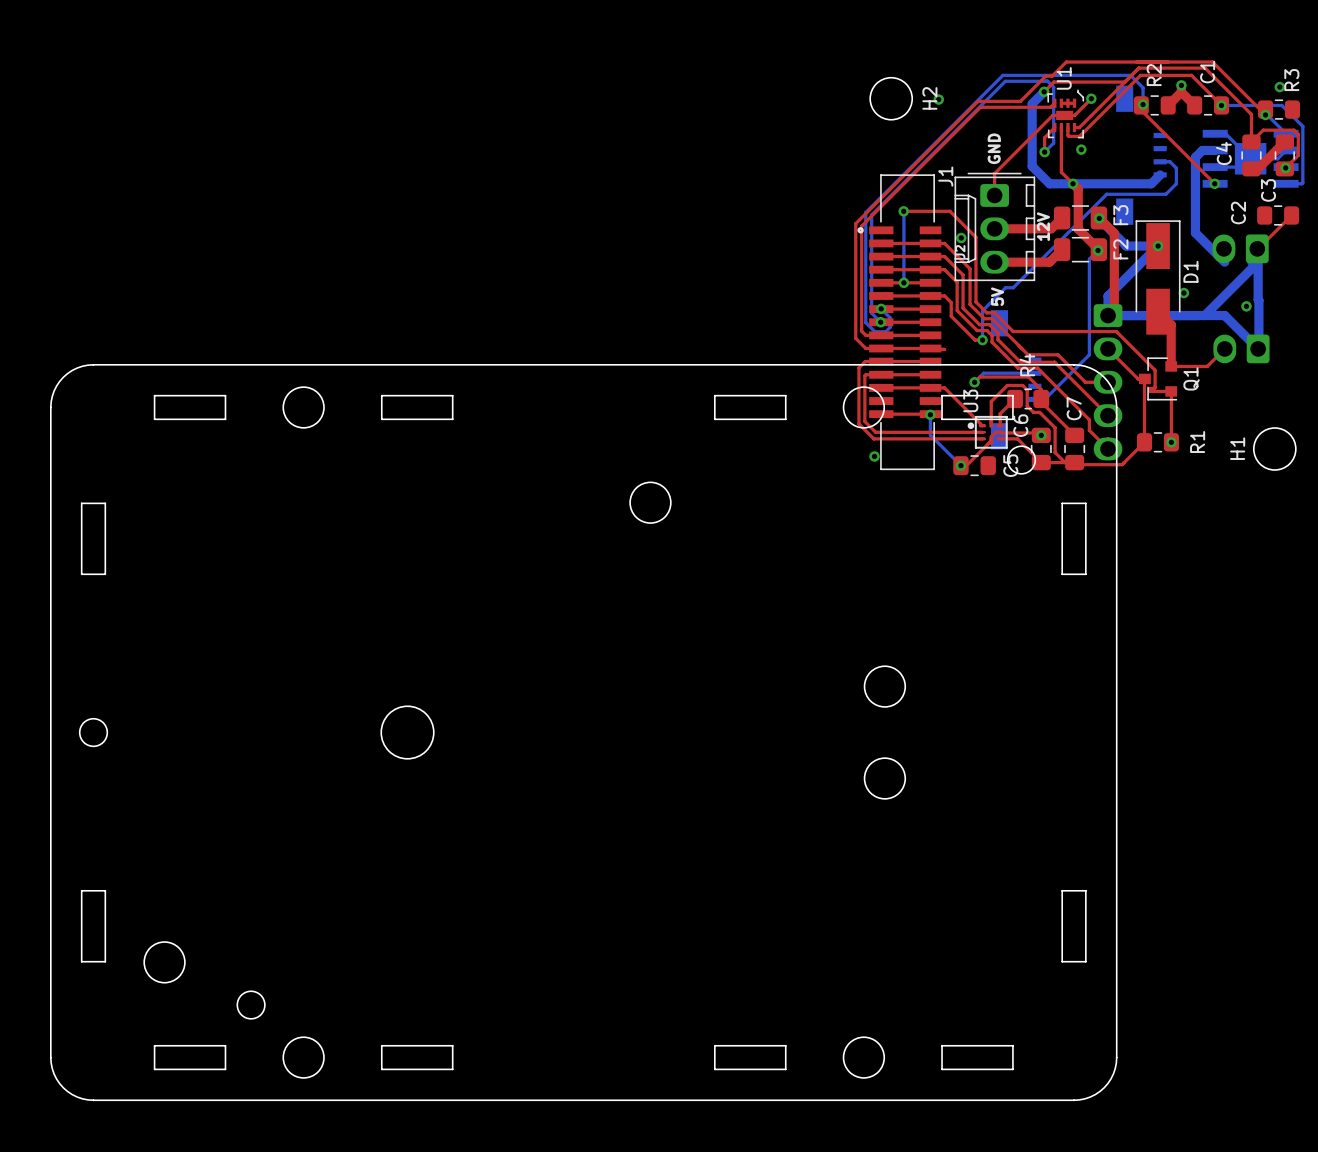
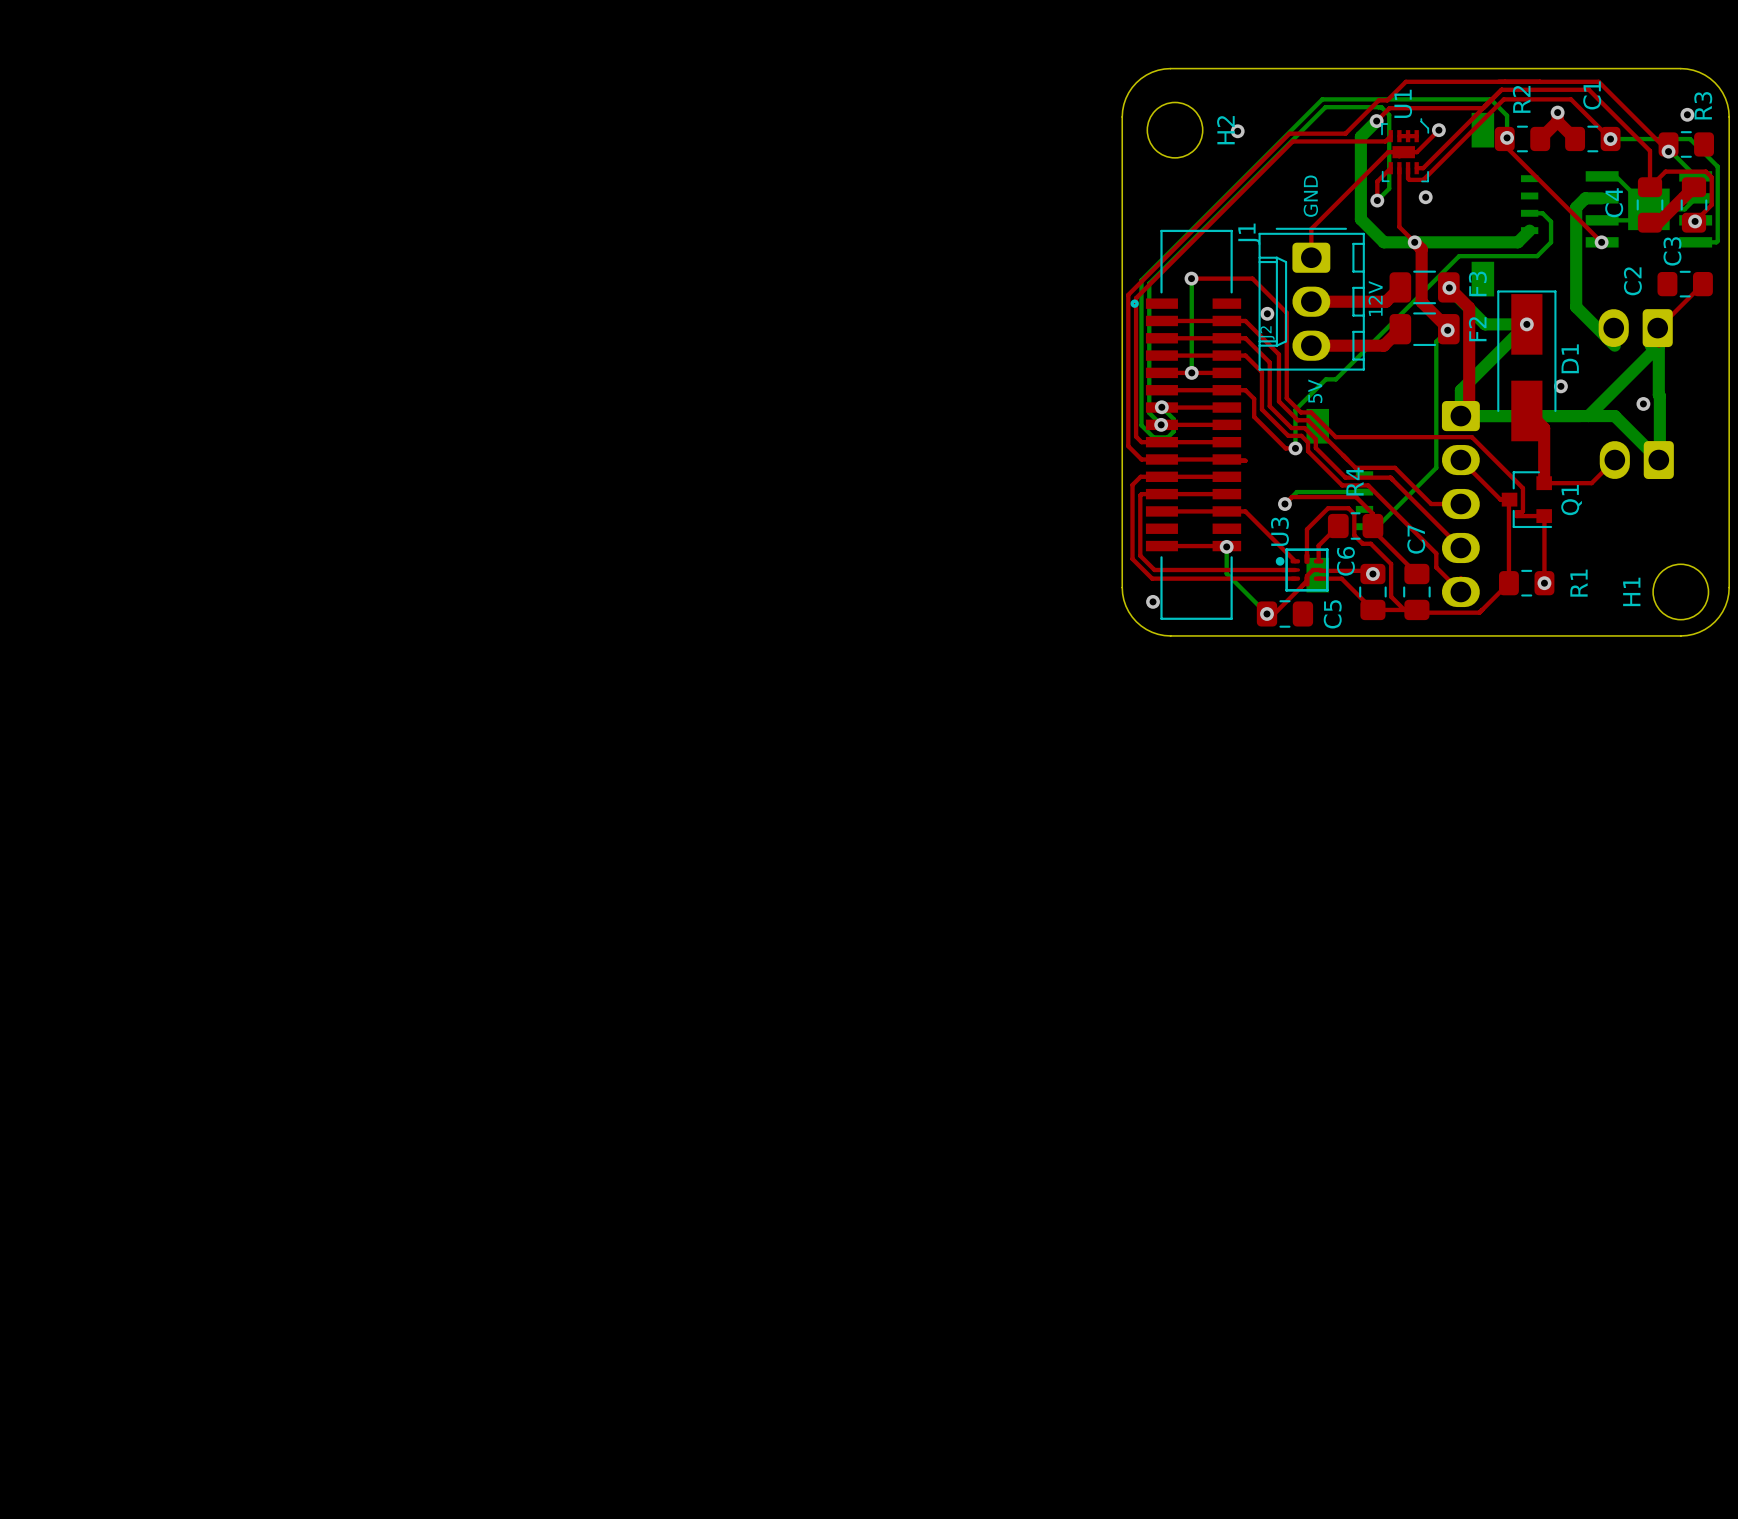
board edge: none -> (1170, 68) (1680, 68) (1699, 72) (1715, 82) (1725, 98) (1729, 116) (1729, 587) (1725, 606) (1715, 621) (1699, 632) (1680, 635) (1170, 635) (1152, 632) (1136, 621) (1125, 606) (1122, 587) (1122, 116) (1125, 98) (1136, 82) (1152, 72) (1170, 68)
board edge: (93, 364) (1074, 364) (1085, 366) (1099, 373) (1113, 391) (1116, 407) (1116, 1057) (1113, 1073) (1107, 1083) (1090, 1097) (1074, 1100) (93, 1100) (77, 1097) (67, 1091) (54, 1073) (50, 1057) (50, 407) (54, 391) (63, 377) (77, 368) (93, 364) -> none
round board edge: [282, 386, 325, 429] -> none
round board edge: [843, 386, 885, 429] -> none
board edge: (154, 395) (225, 395) (225, 419) (154, 419) (154, 395) -> none
board edge: (381, 395) (452, 395) (452, 419) (381, 419) (381, 395) -> none
board edge: (714, 395) (785, 395) (785, 419) (714, 419) (714, 395) -> none
board edge: (942, 395) (1012, 395) (1012, 419) (942, 419) (942, 395) -> none
round board edge: [1007, 445, 1036, 475] -> none
round board edge: [629, 482, 672, 524] -> none
board edge: (81, 503) (105, 503) (105, 574) (81, 574) (81, 503) -> none
board edge: (1062, 503) (1062, 574) (1085, 574) (1085, 503) (1062, 503) -> none
round board edge: [864, 665, 906, 708] -> none
round board edge: [380, 705, 435, 760] -> none
round board edge: [79, 718, 108, 747] -> none
round board edge: [864, 757, 906, 800] -> none
board edge: (81, 890) (105, 890) (105, 961) (81, 961) (81, 890) -> none
board edge: (1062, 890) (1085, 890) (1085, 961) (1062, 961) (1062, 890) -> none
round board edge: [143, 941, 186, 984] -> none
round board edge: [236, 990, 266, 1020] -> none
round board edge: [282, 1036, 325, 1079] -> none
round board edge: [843, 1036, 885, 1079] -> none
board edge: (154, 1045) (154, 1069) (225, 1069) (225, 1045) (154, 1045) -> none
board edge: (381, 1045) (381, 1069) (452, 1069) (452, 1045) (381, 1045) -> none
board edge: (714, 1045) (714, 1069) (785, 1069) (785, 1045) (714, 1045) -> none
board edge: (942, 1045) (942, 1069) (1012, 1069) (1012, 1045) (942, 1045) -> none

